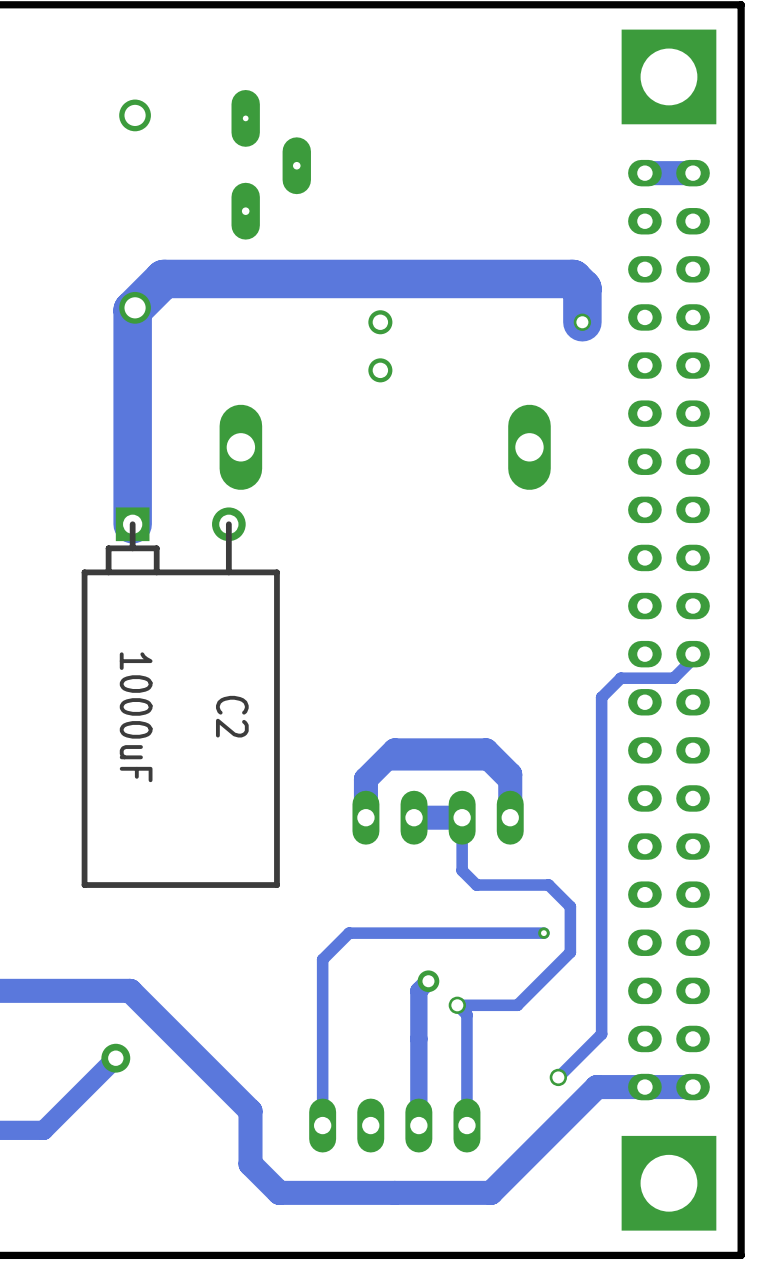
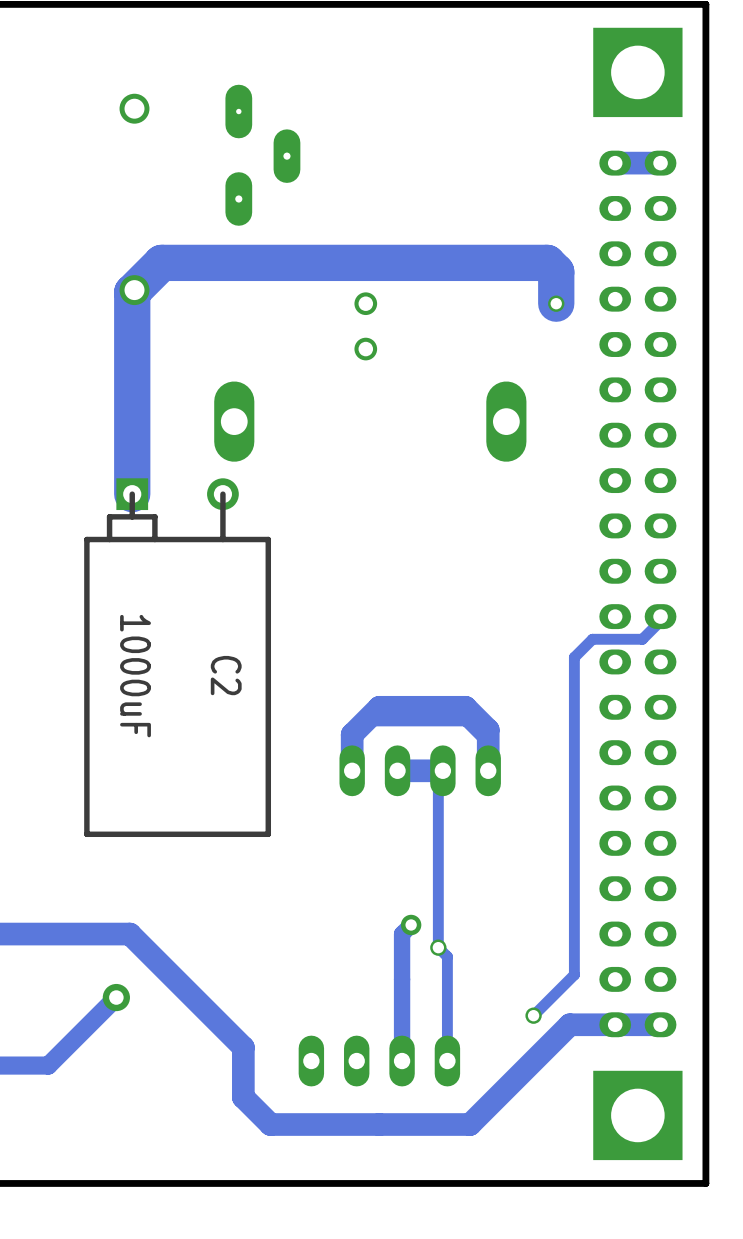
track: (462, 817) (462, 870) (476, 885) (548, 885) (570, 906) (570, 952) (517, 1005) (457, 1005) -> (442, 770) (438, 775) (438, 947)
track: (543, 933) (349, 933) (322, 959) (322, 1125) -> none
via: (543, 933) -> none

